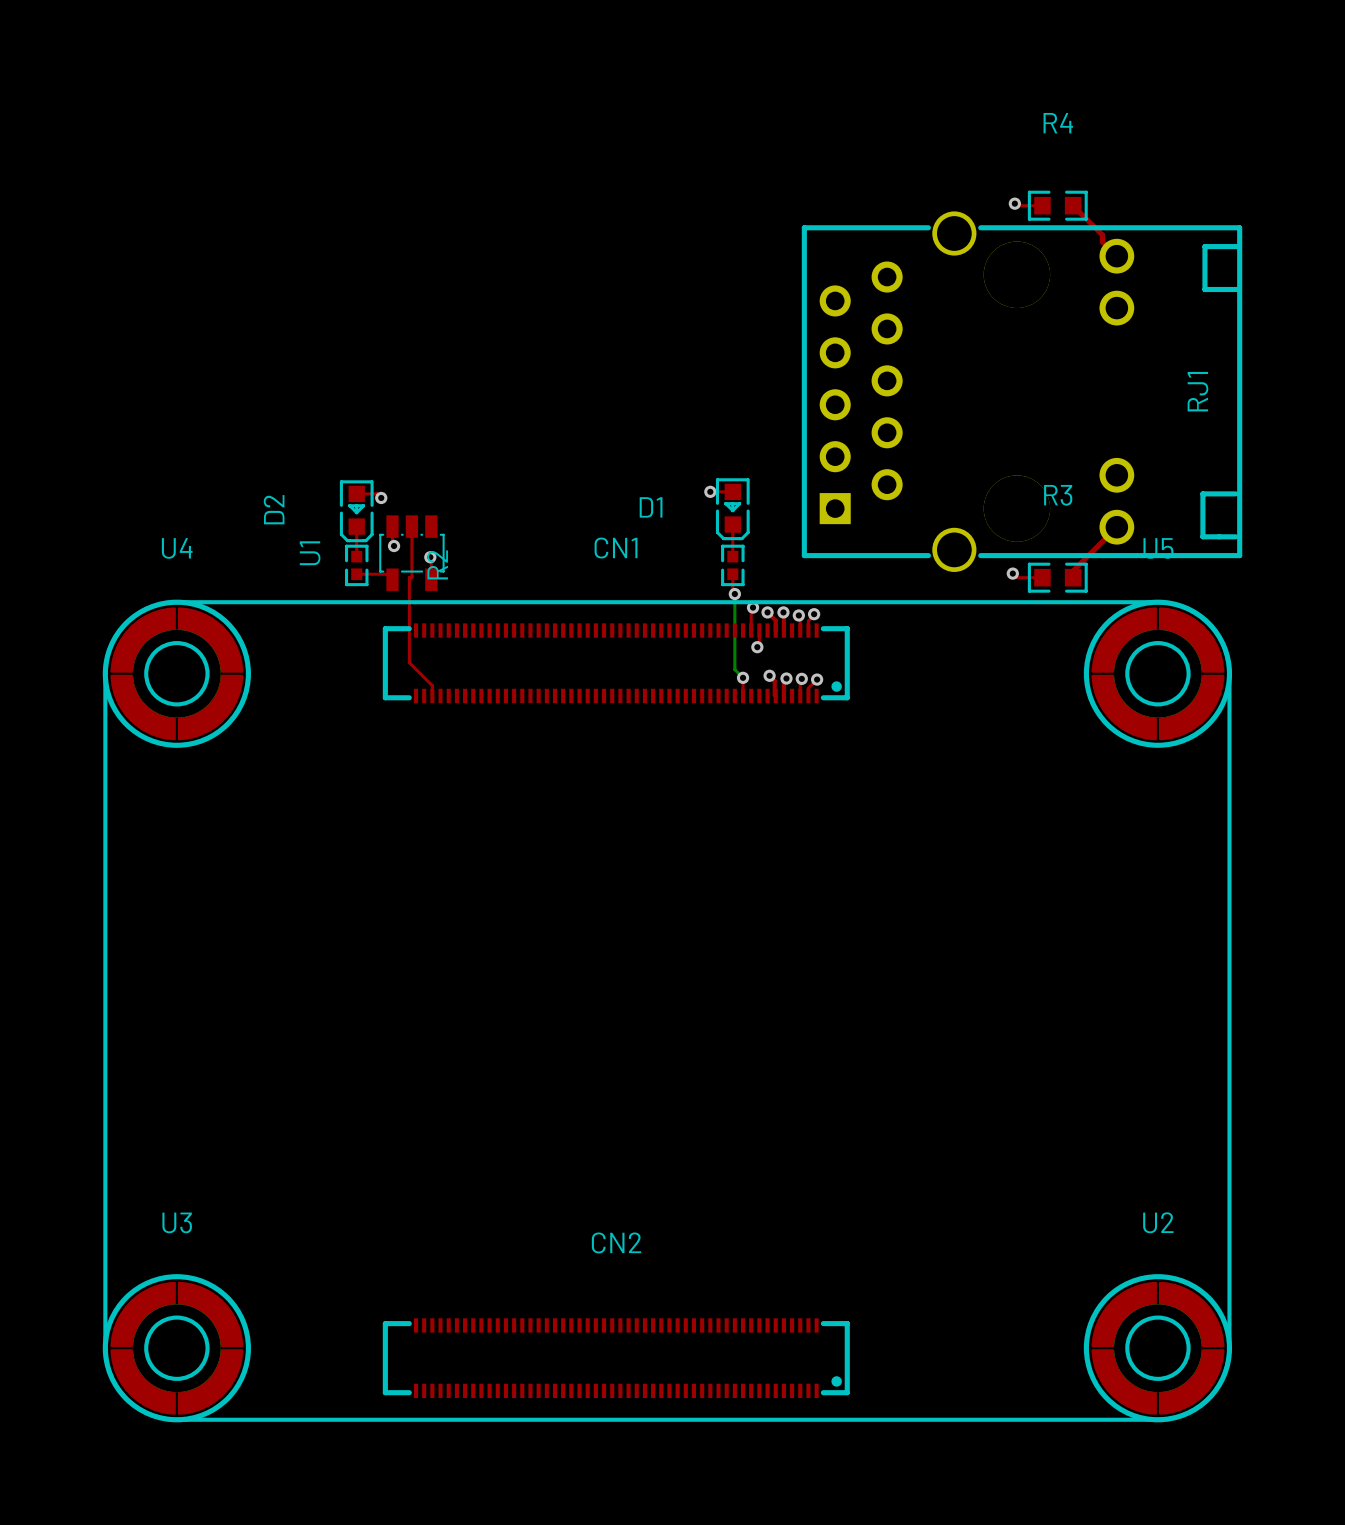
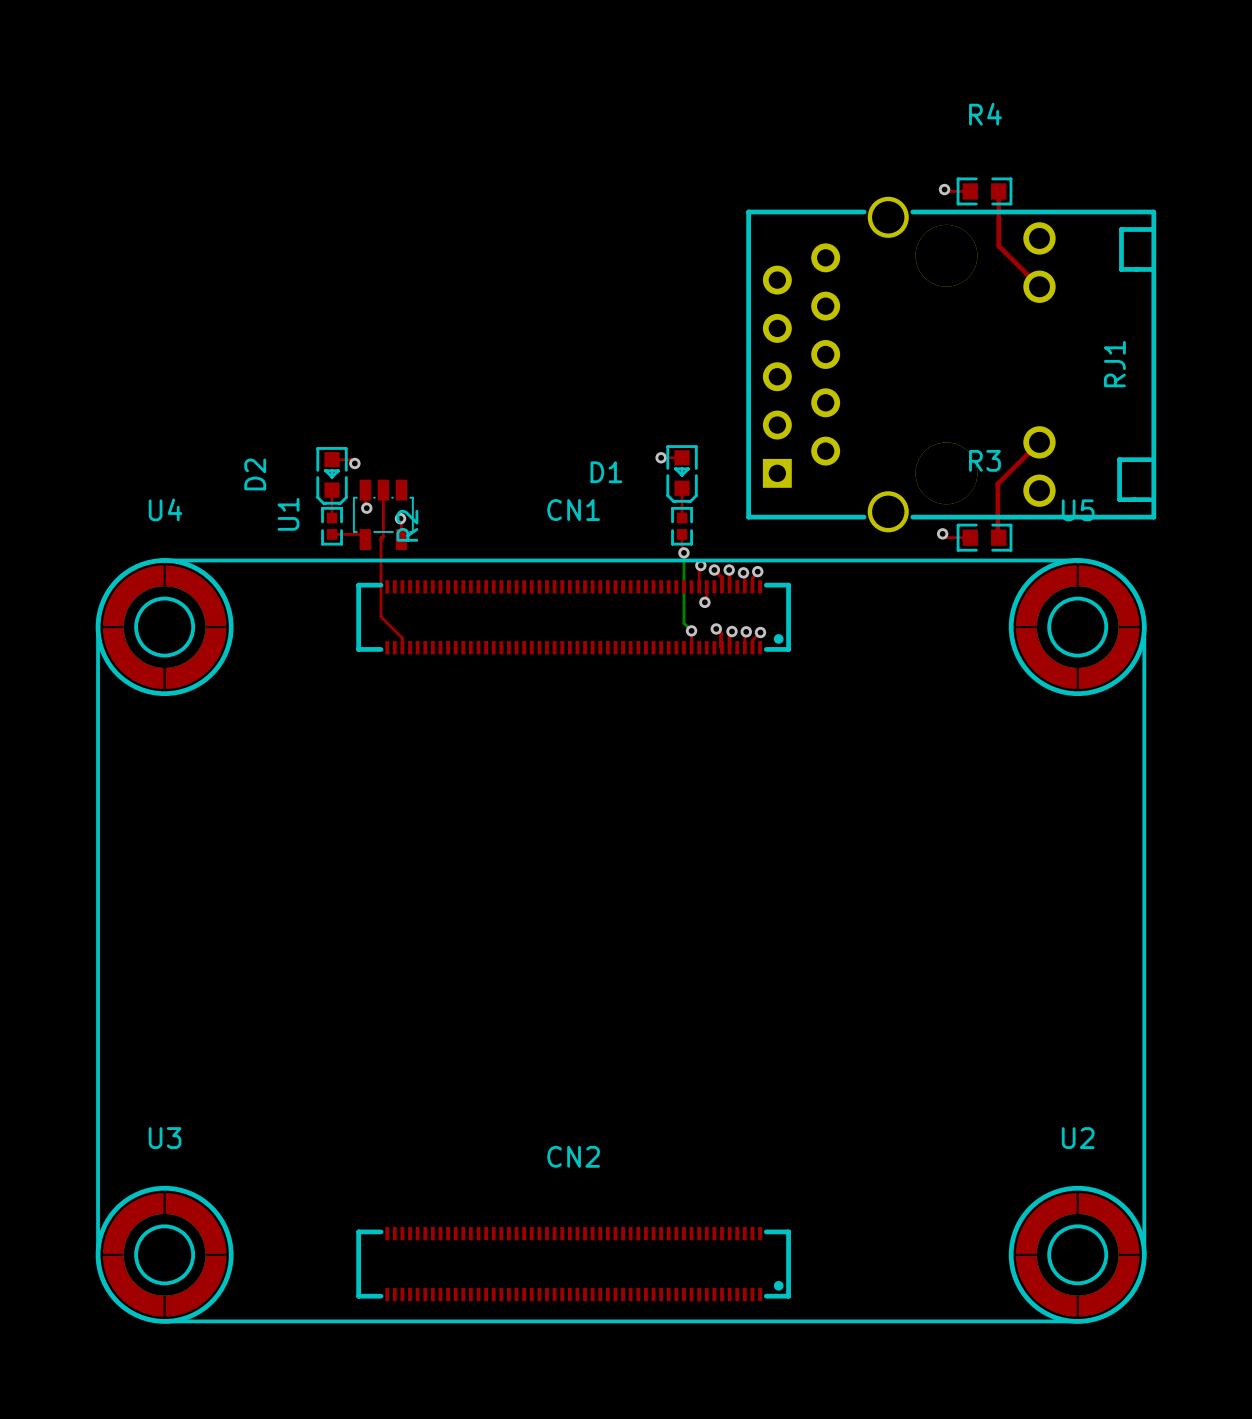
top track: (1073, 205) (1102, 235) (1102, 241) (1116, 256) -> (998, 191) (998, 246) (1039, 286)
top track: (1116, 527) (1073, 570) (1073, 577) -> (1039, 442) (997, 484) (998, 537)

